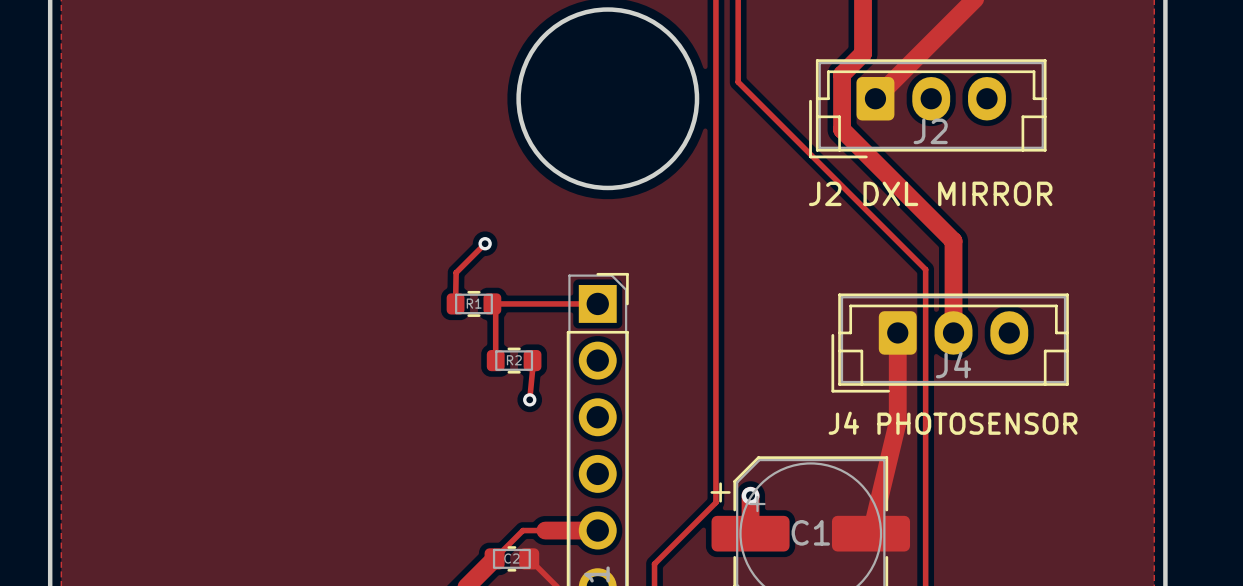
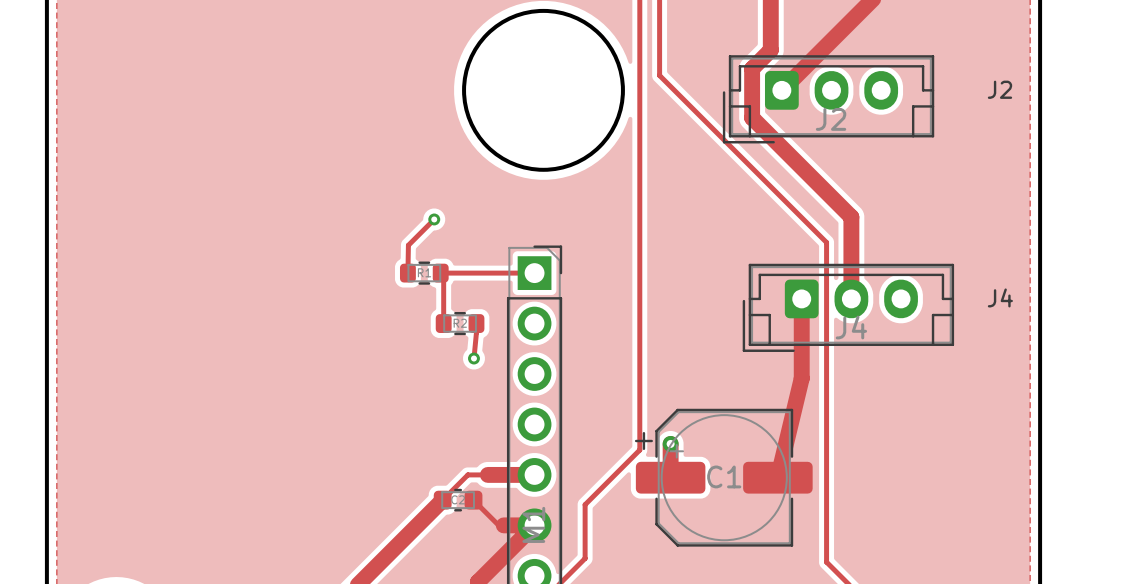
text: none -> J2 (999, 89)
text: J2 DXL MIRROR (930, 193) -> none
text: none -> J4 (1000, 297)
text: J4 PHOTOSENSOR (953, 423) -> none

